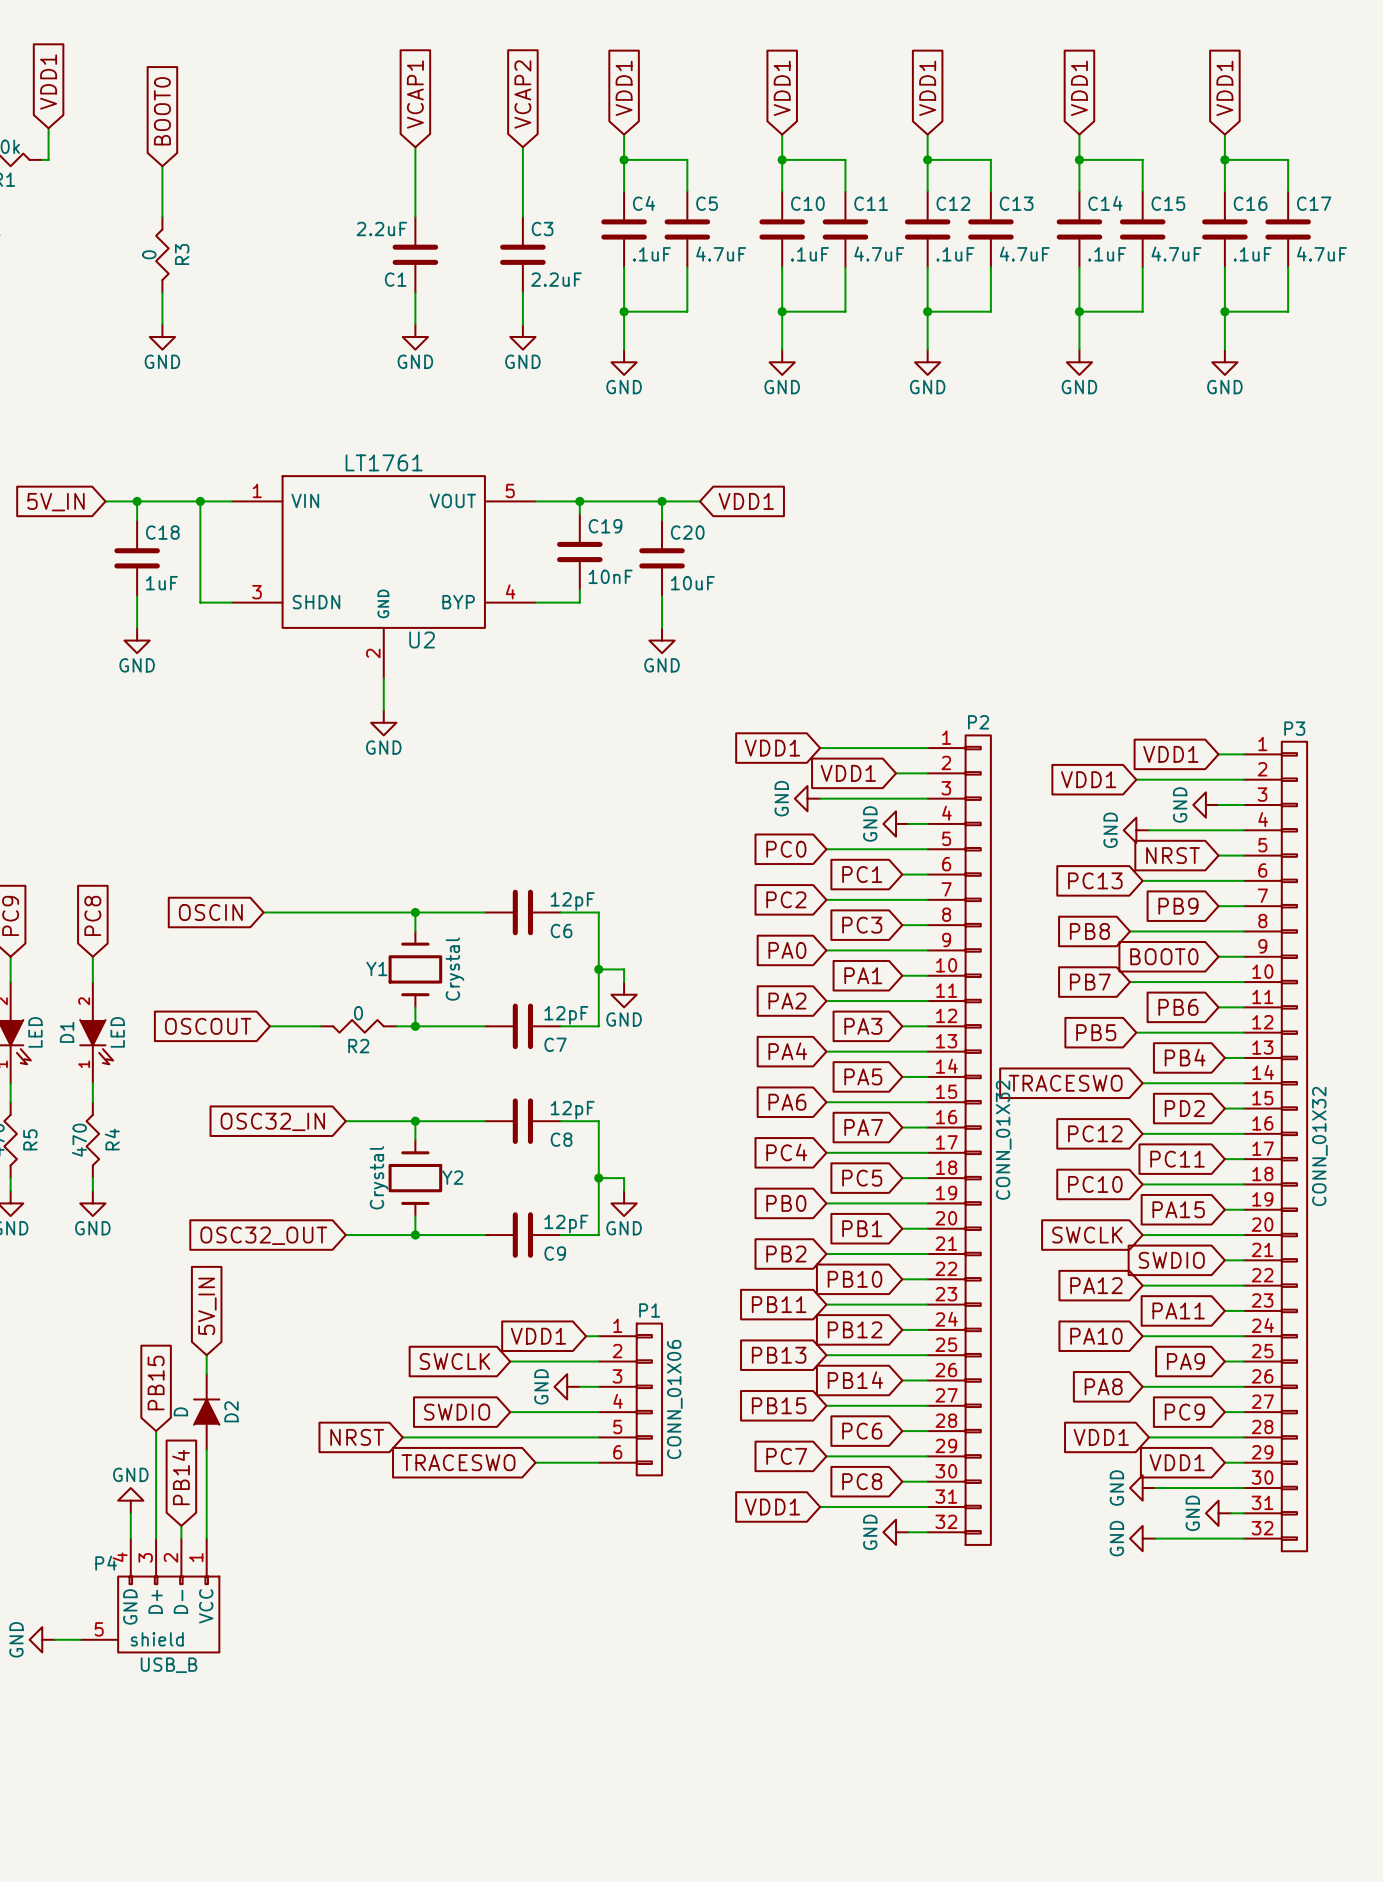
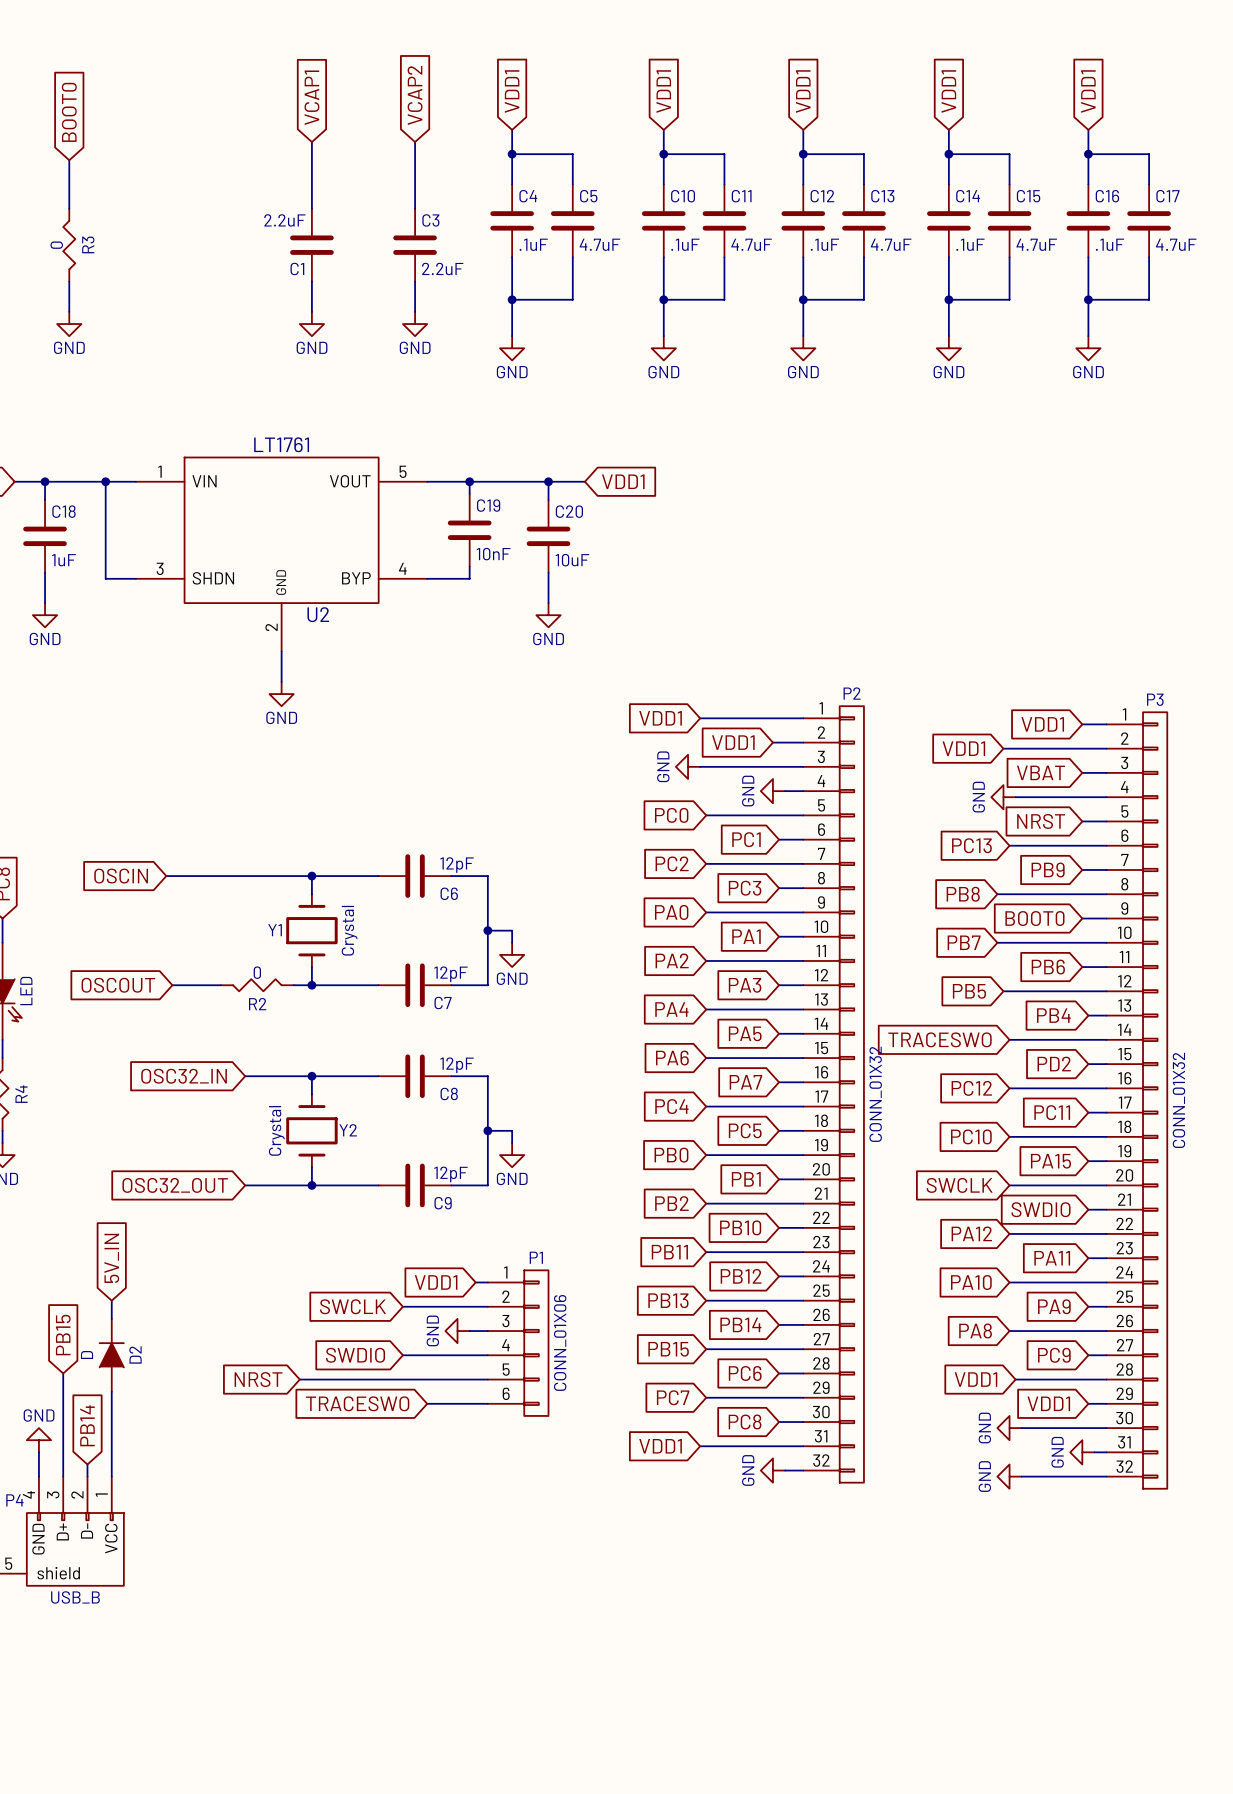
global label: none -> VBAT (1041, 772)
power symbol: GND (1205, 804) -> none

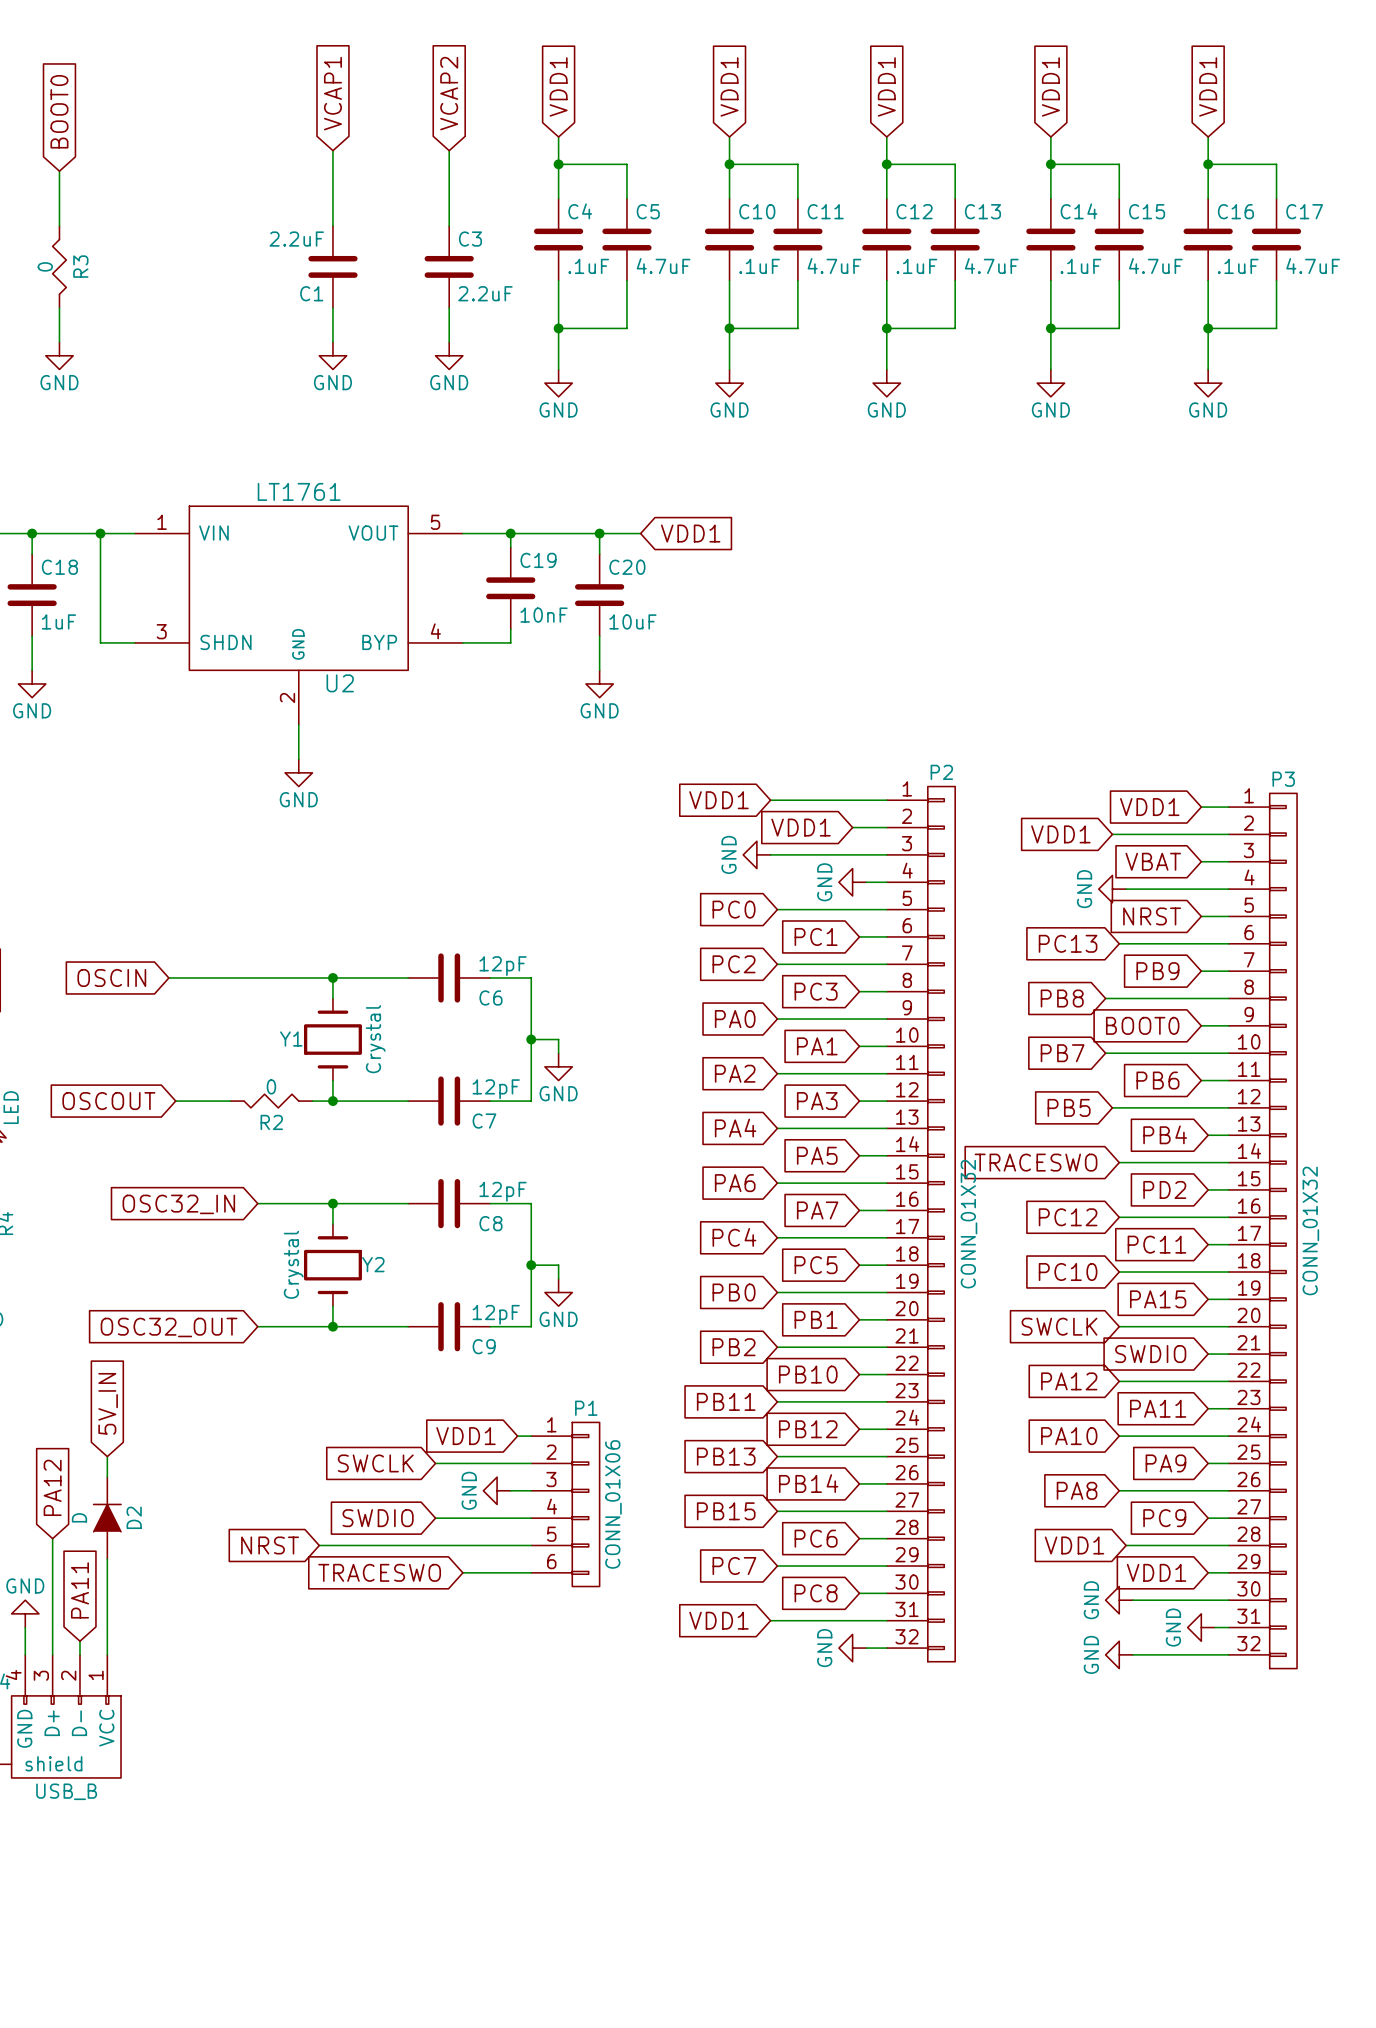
global label: PB15 (63, 1335) -> PA12 (52, 1487)
global label: PB14 (87, 1425) -> PA11 (79, 1590)

